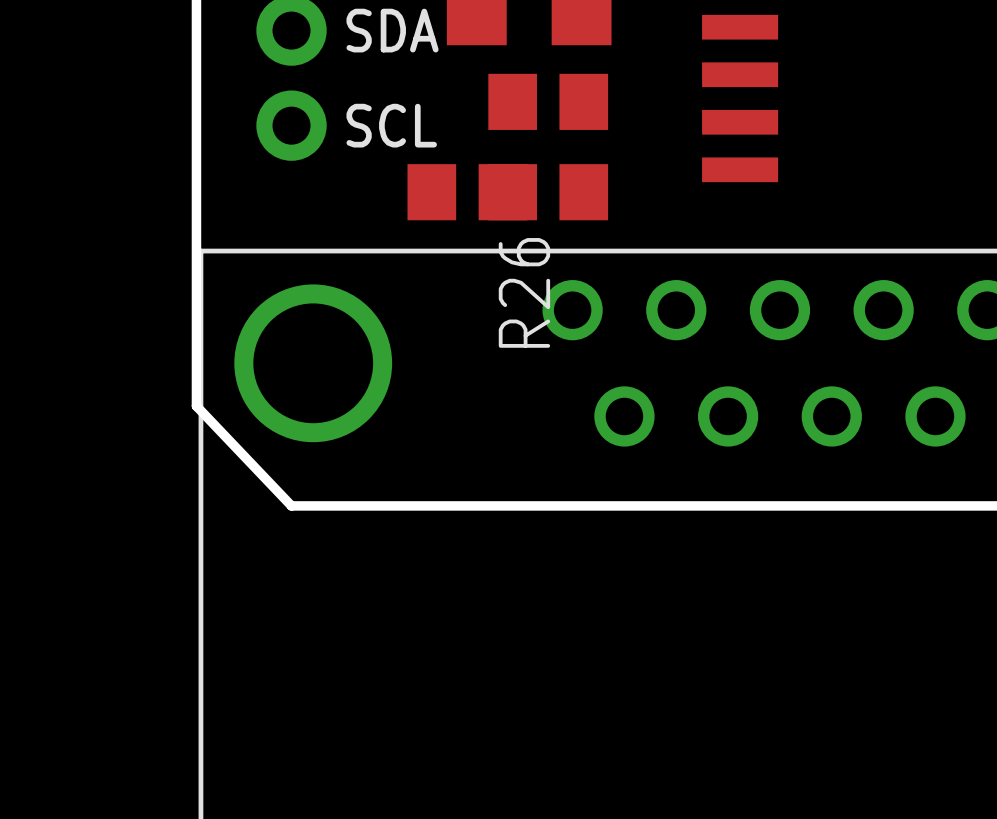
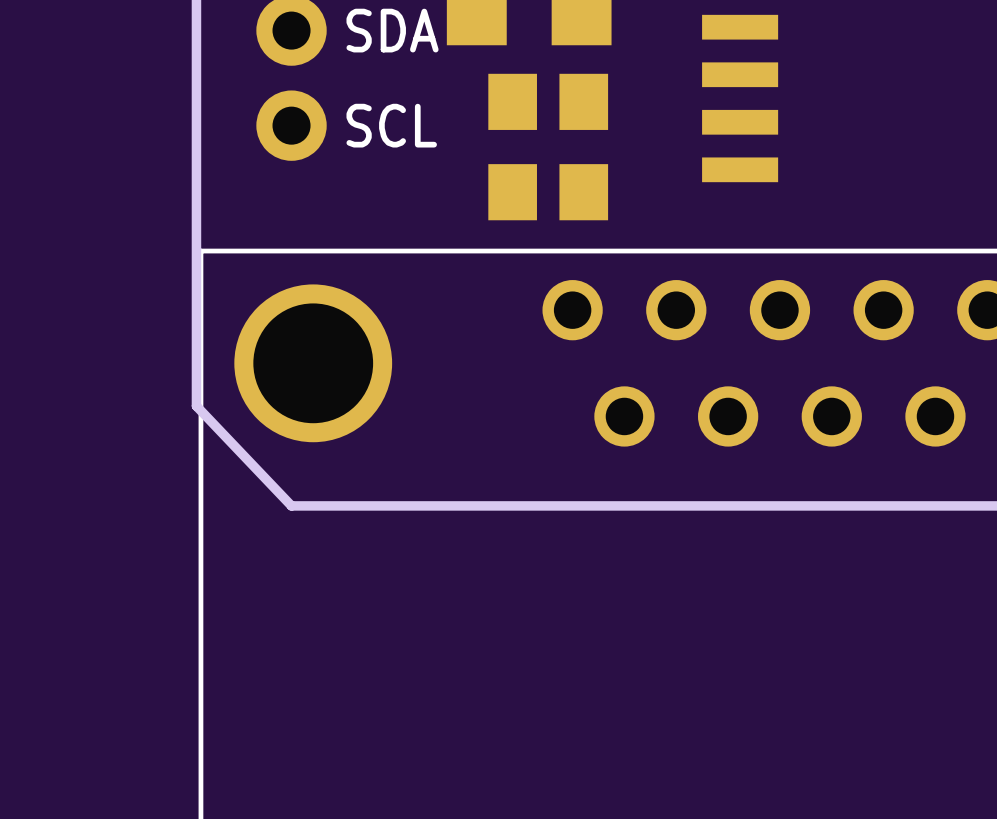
R26: (467, 192) -> none

